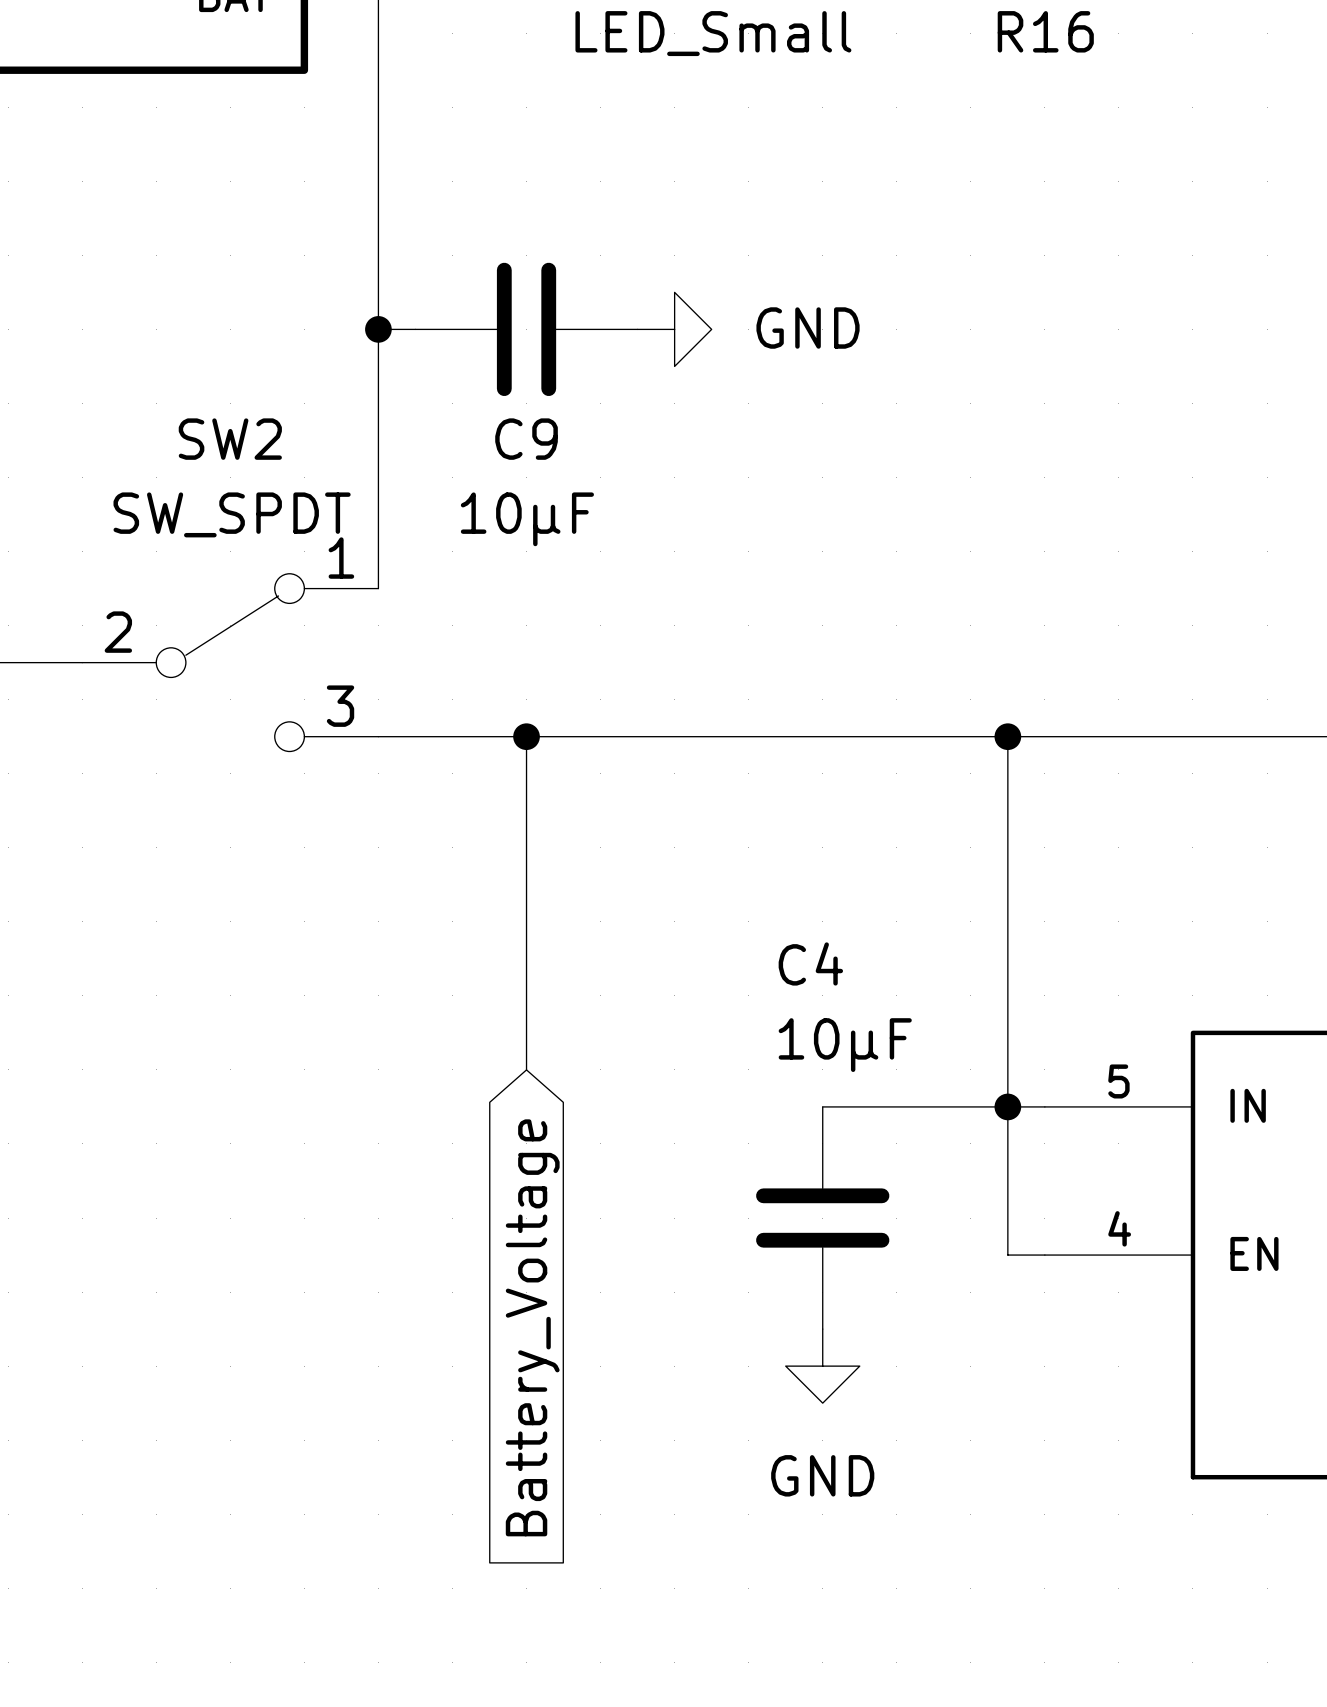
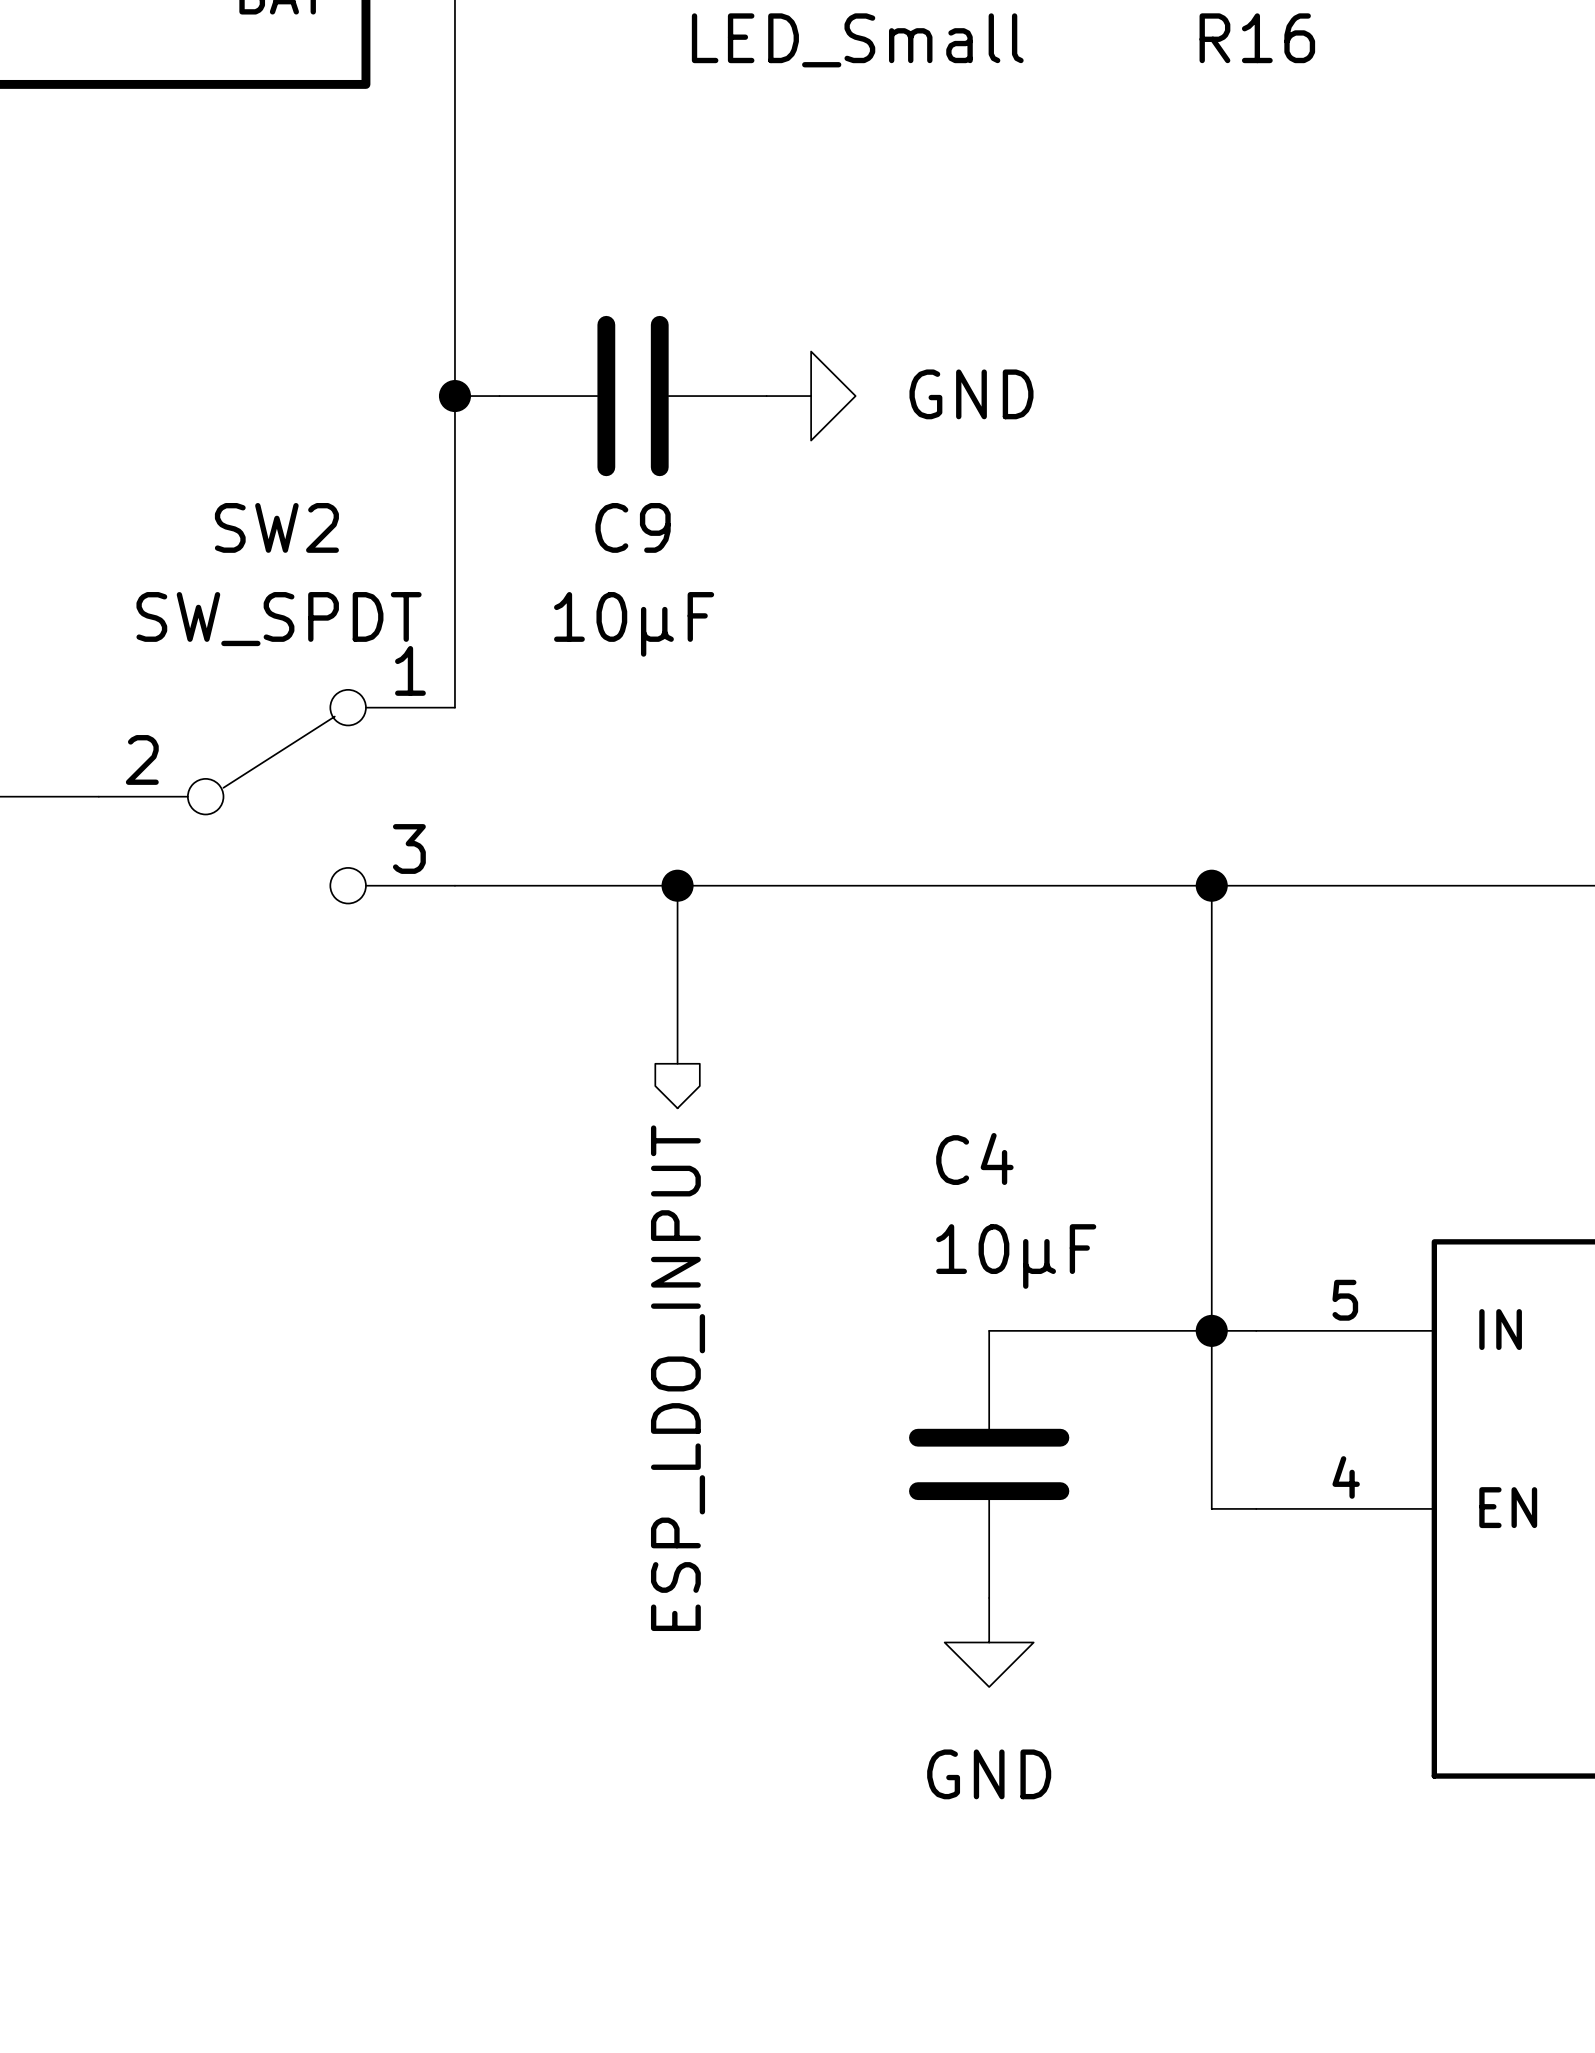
wire: (526, 736) (526, 1069) -> none
junction position: (526, 736) -> (677, 885)
wire: none -> (677, 885) (677, 1063)
hierarchical label: none -> ESP_LDO_INPUT (678, 1378)
global label: Battery_Voltage (532, 1327) -> none

